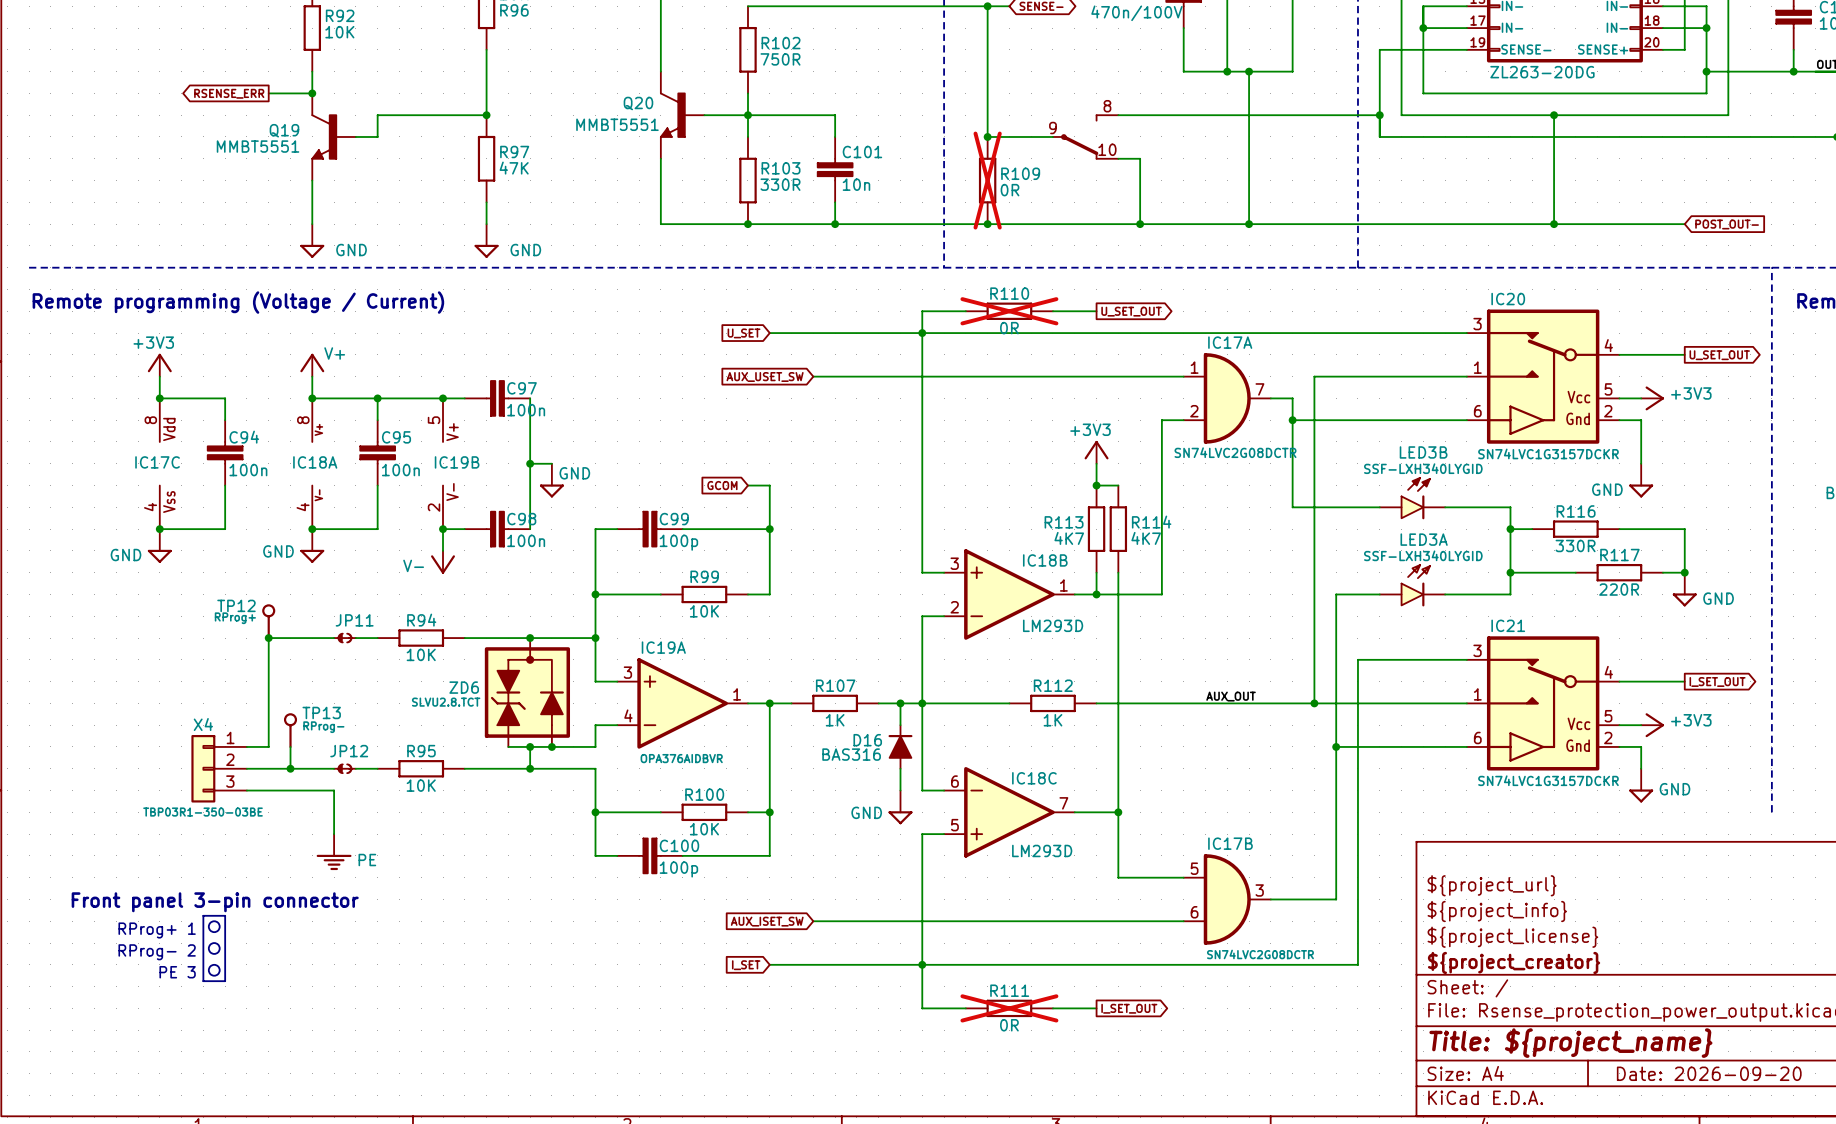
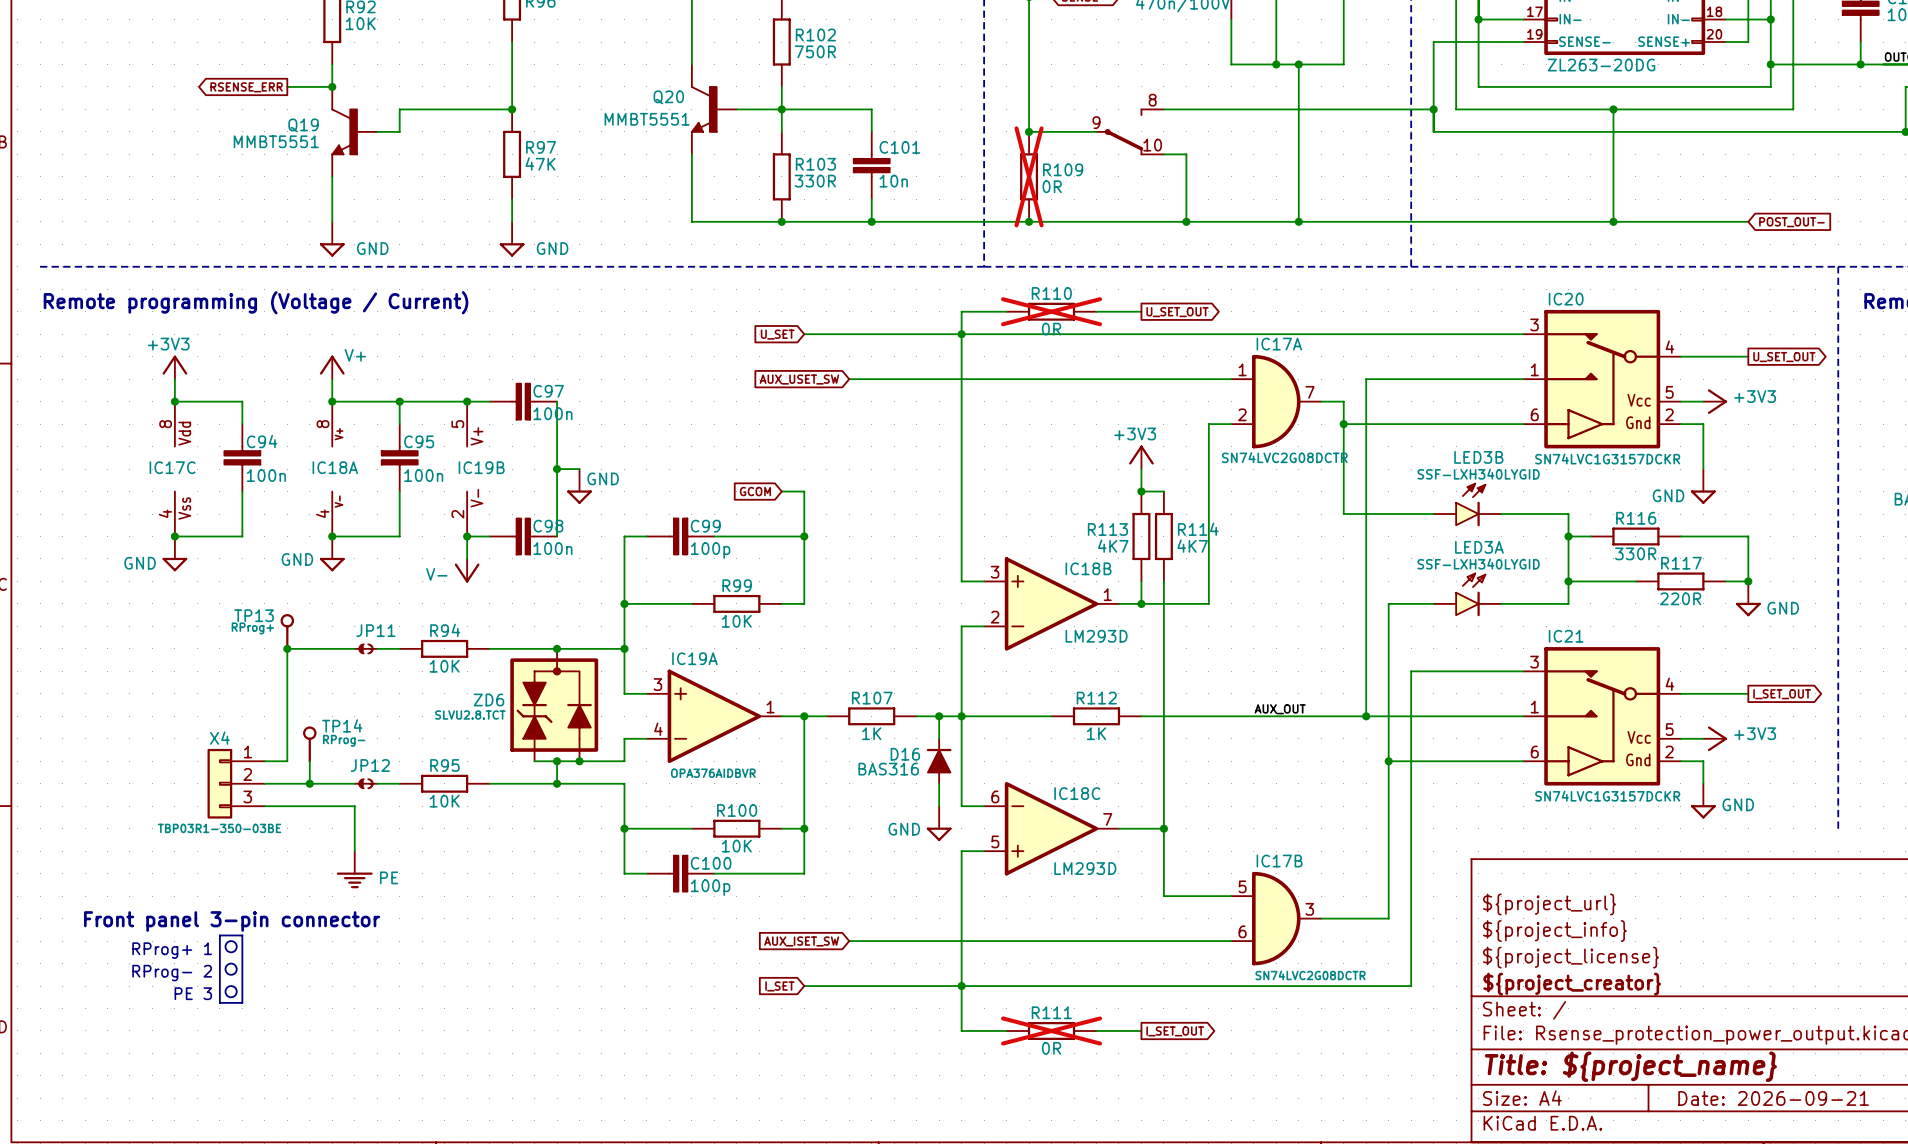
TP12 name: TP12 (236, 605) -> TP13 (254, 615)
TP13 name: TP13 (321, 712) -> TP14 (342, 725)
title block: Date: 2026-09-20 (1709, 1073) -> Date: 2026-09-21 (1773, 1098)

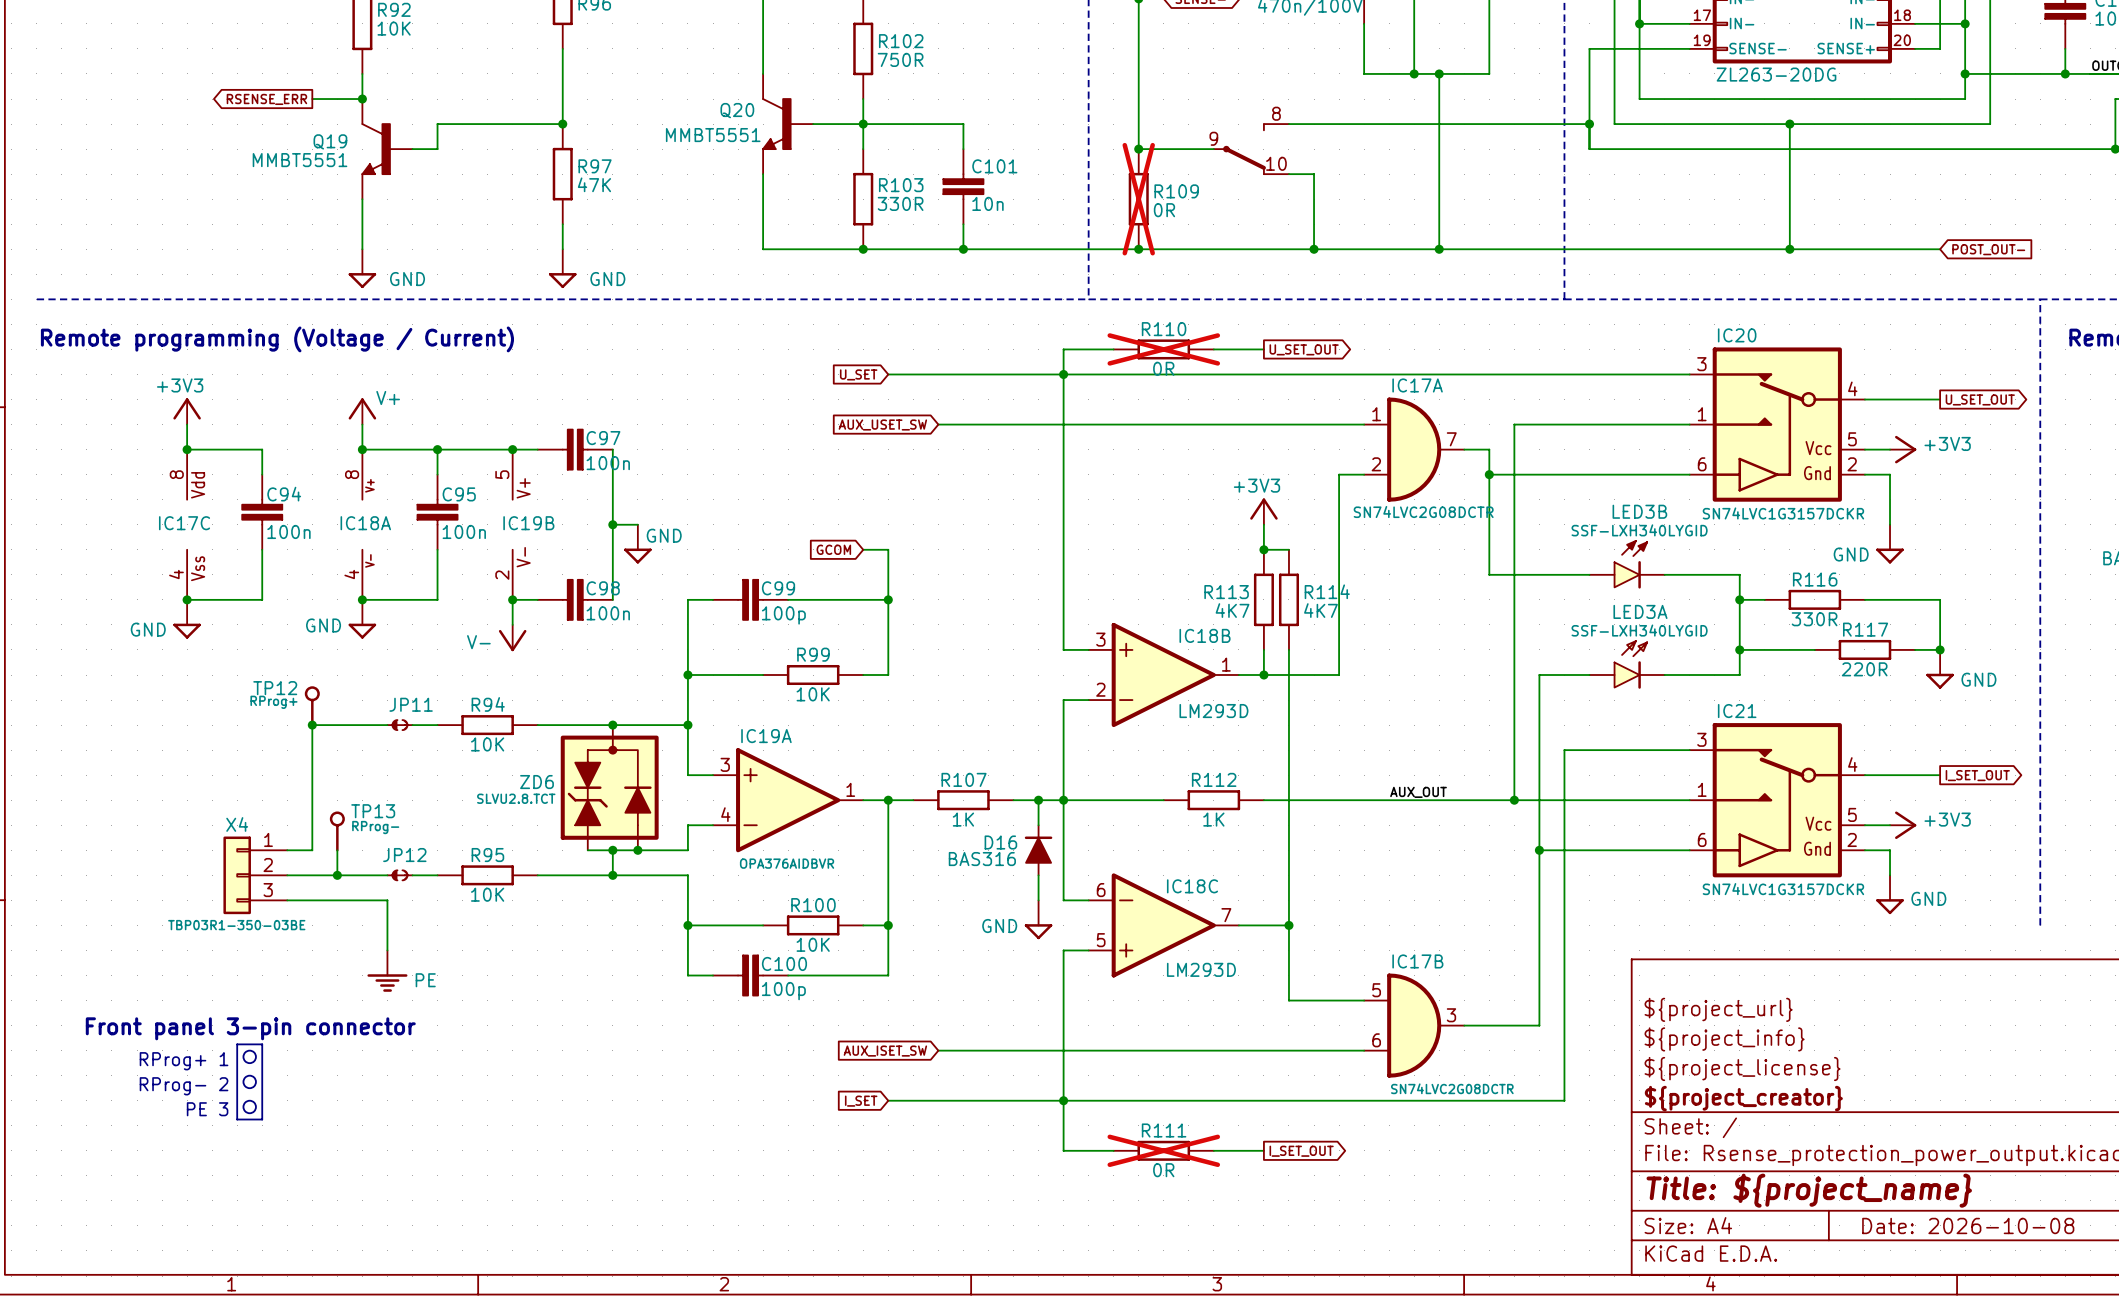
TP13 name: TP13 (254, 615) -> TP12 (275, 688)
TP14 name: TP14 (342, 725) -> TP13 (373, 811)
title block: Date: 2026-09-21 (1773, 1098) -> Date: 2026-10-08 (1968, 1225)

